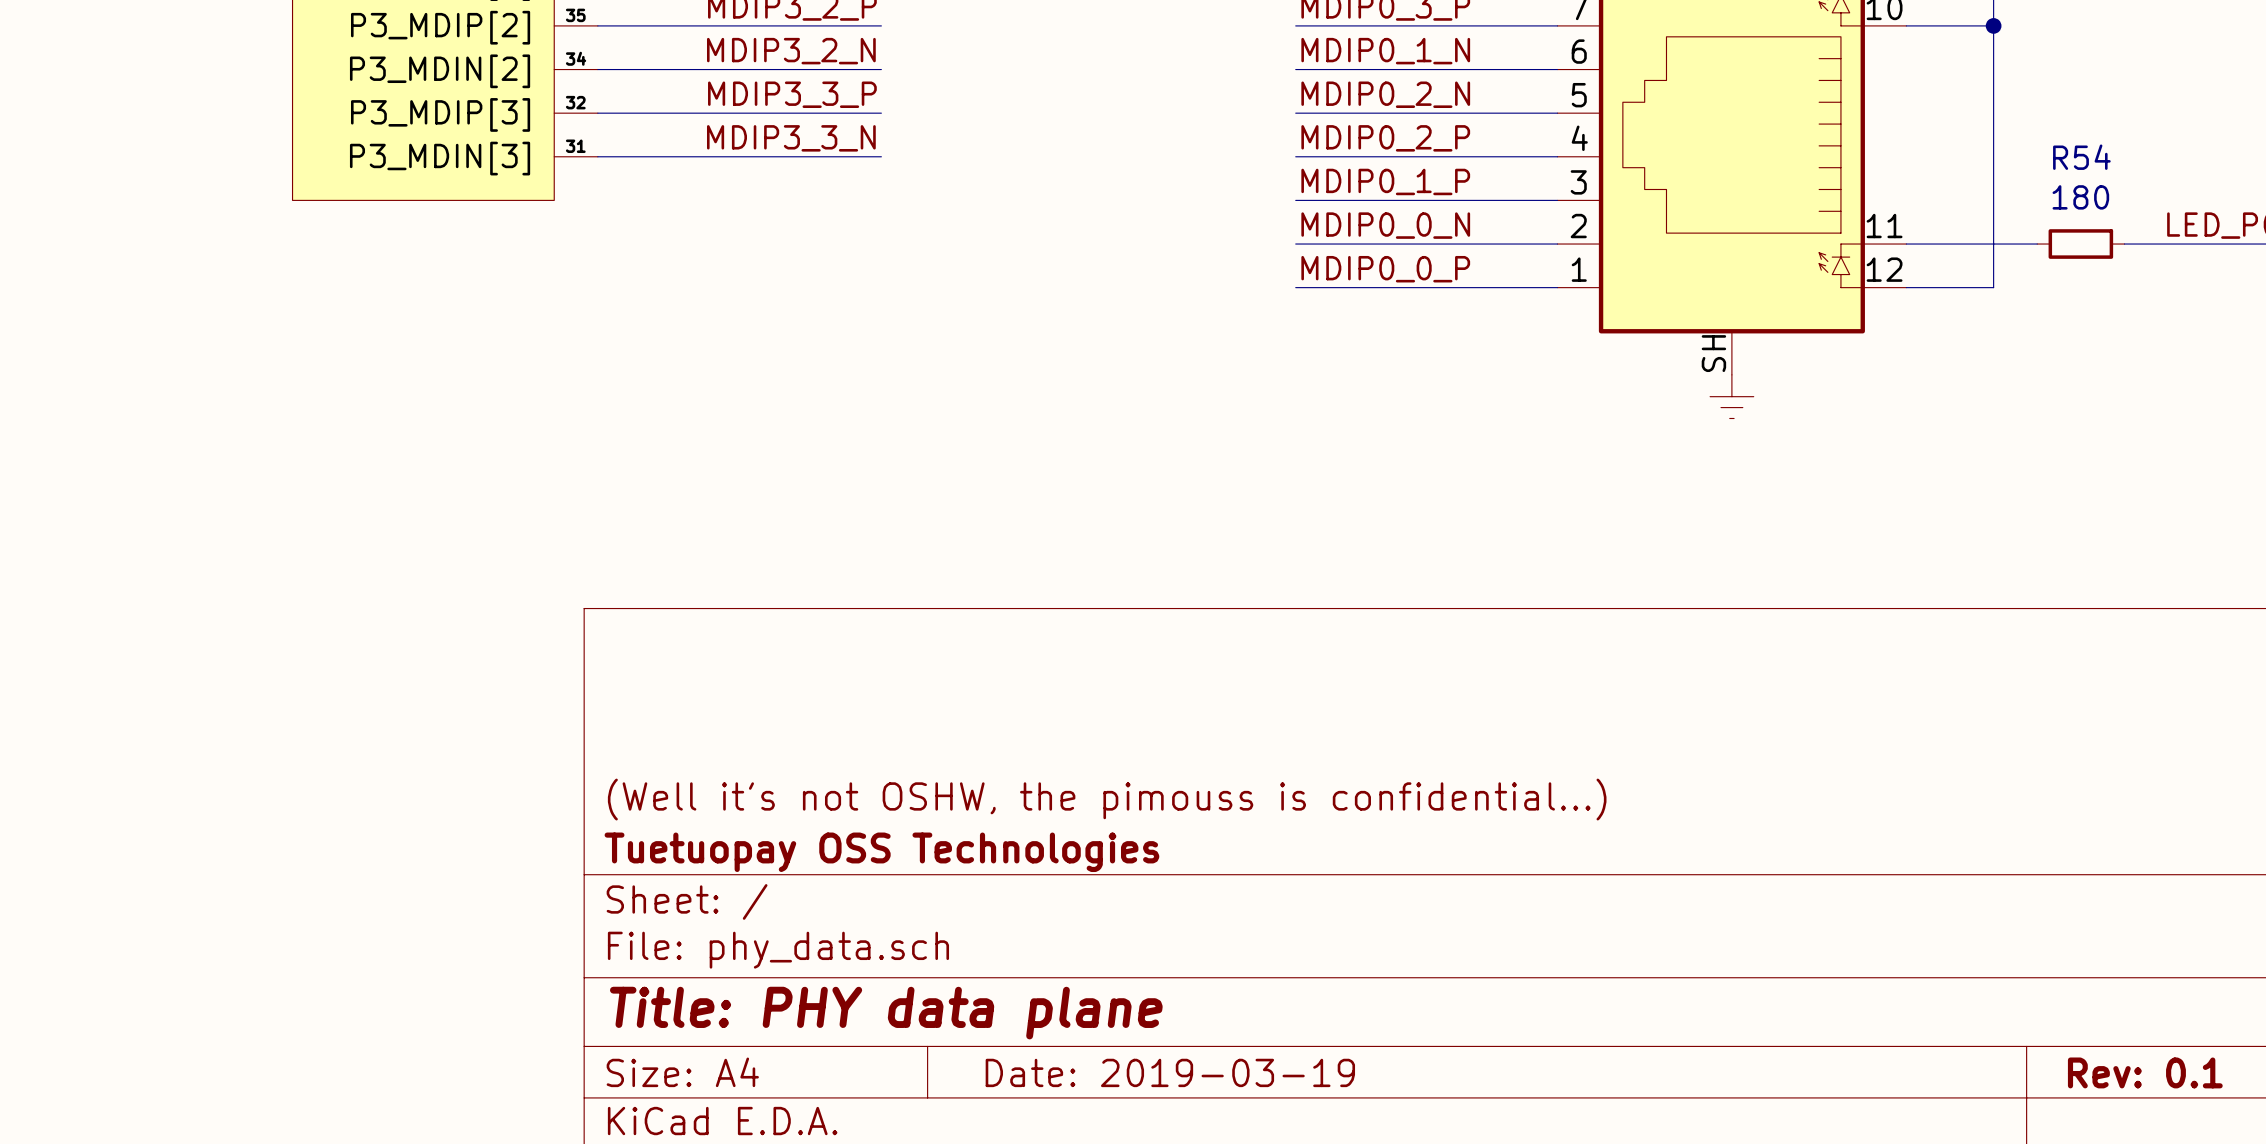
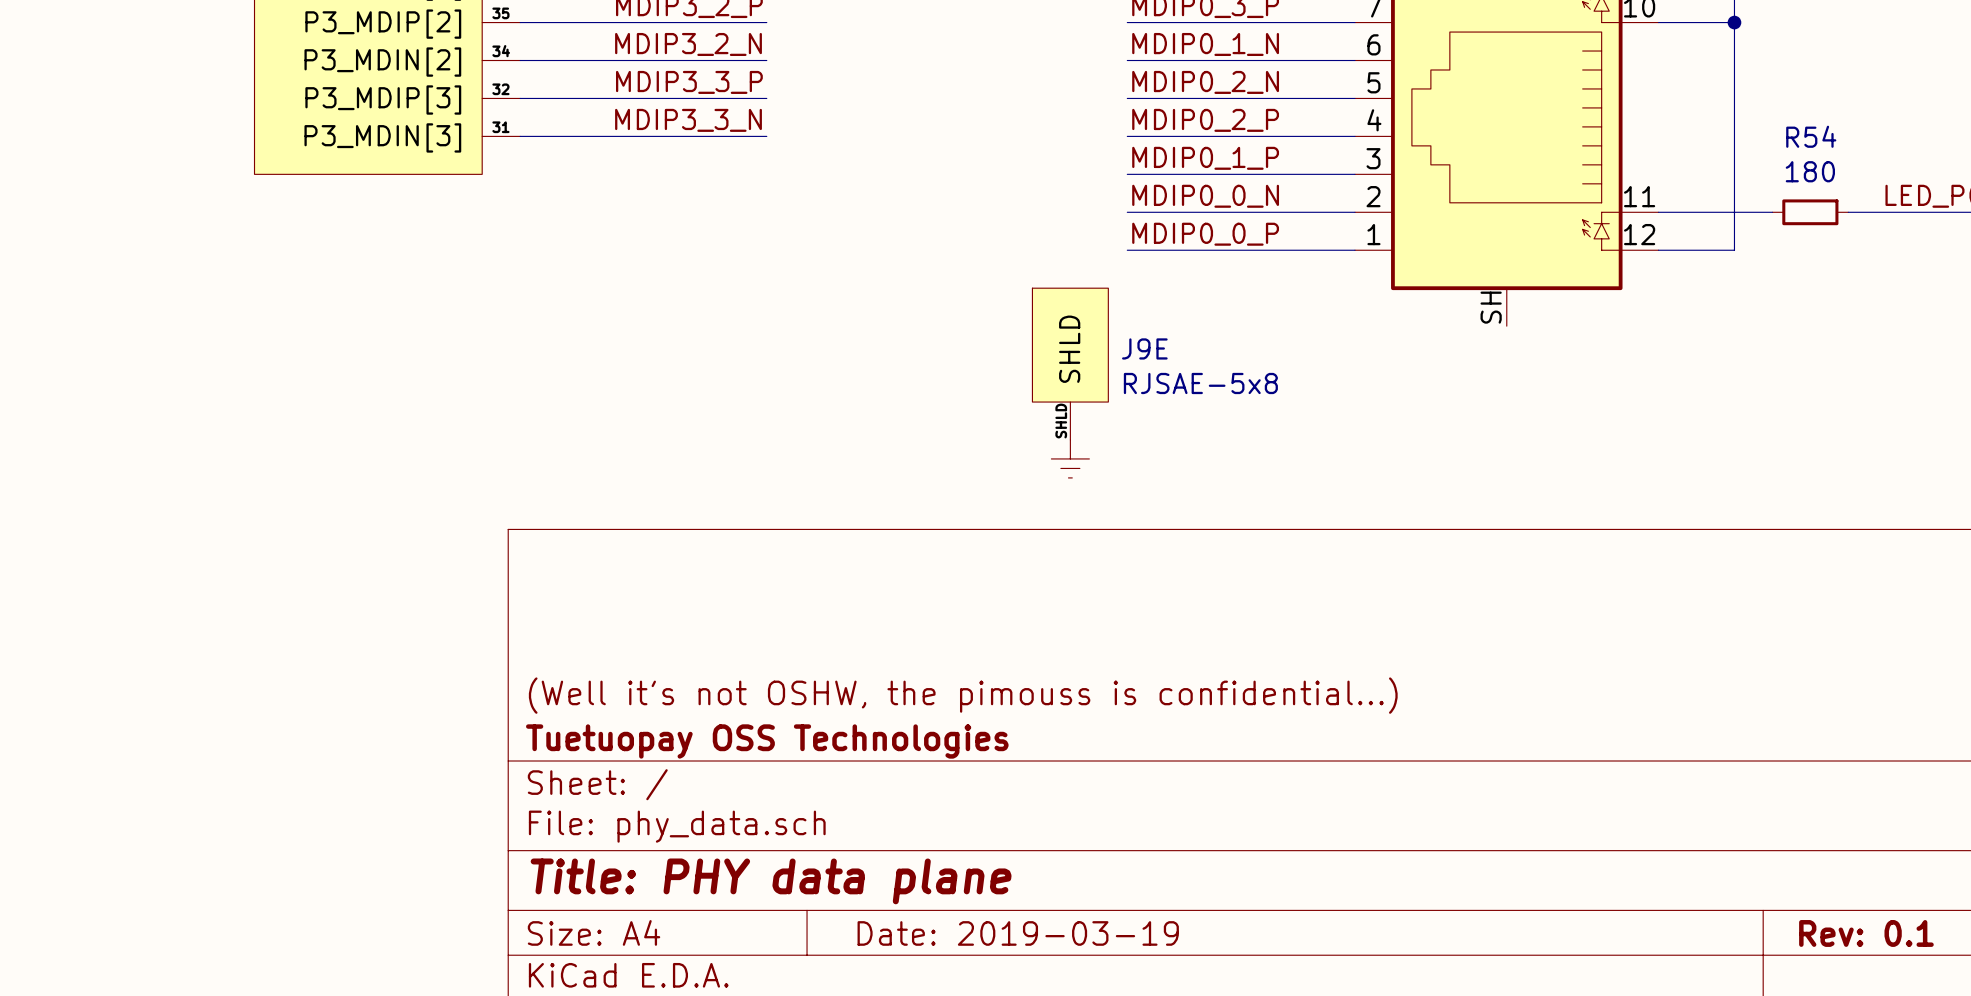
power symbol: (1731, 396) -> none
J9E: none -> RJSAE-5x8 (1070, 364)
power symbol: none -> (1070, 458)

